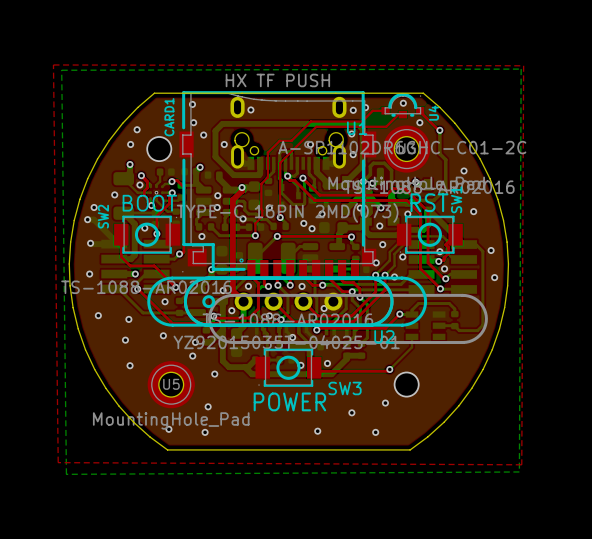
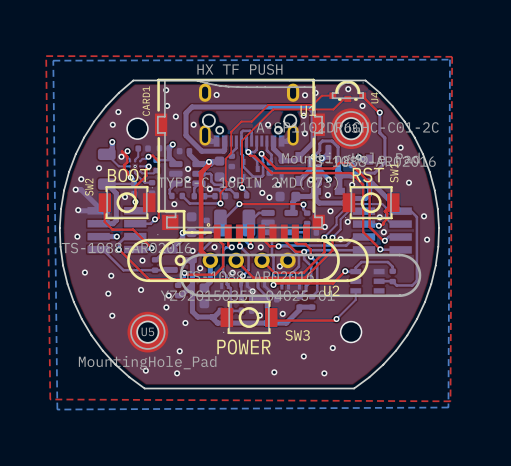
via: (141, 175) -> none
via: none -> (127, 151)
via: none -> (121, 156)
via: (139, 184) -> none

